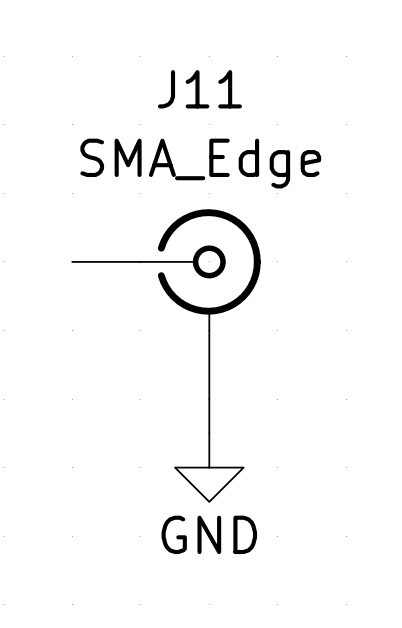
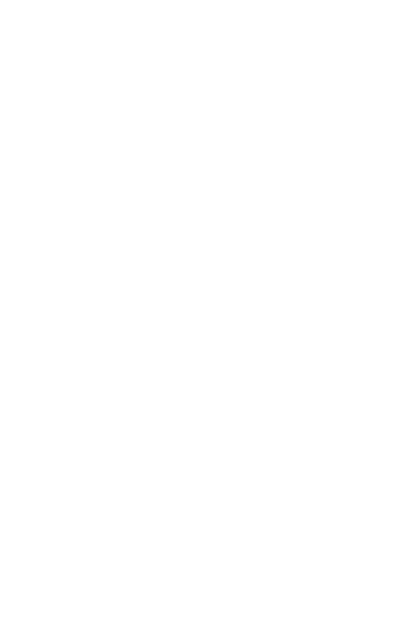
J11: SMA_Edge (166, 304) -> none
wire: (209, 399) (209, 433) -> none
power symbol: GND (209, 467) -> none

